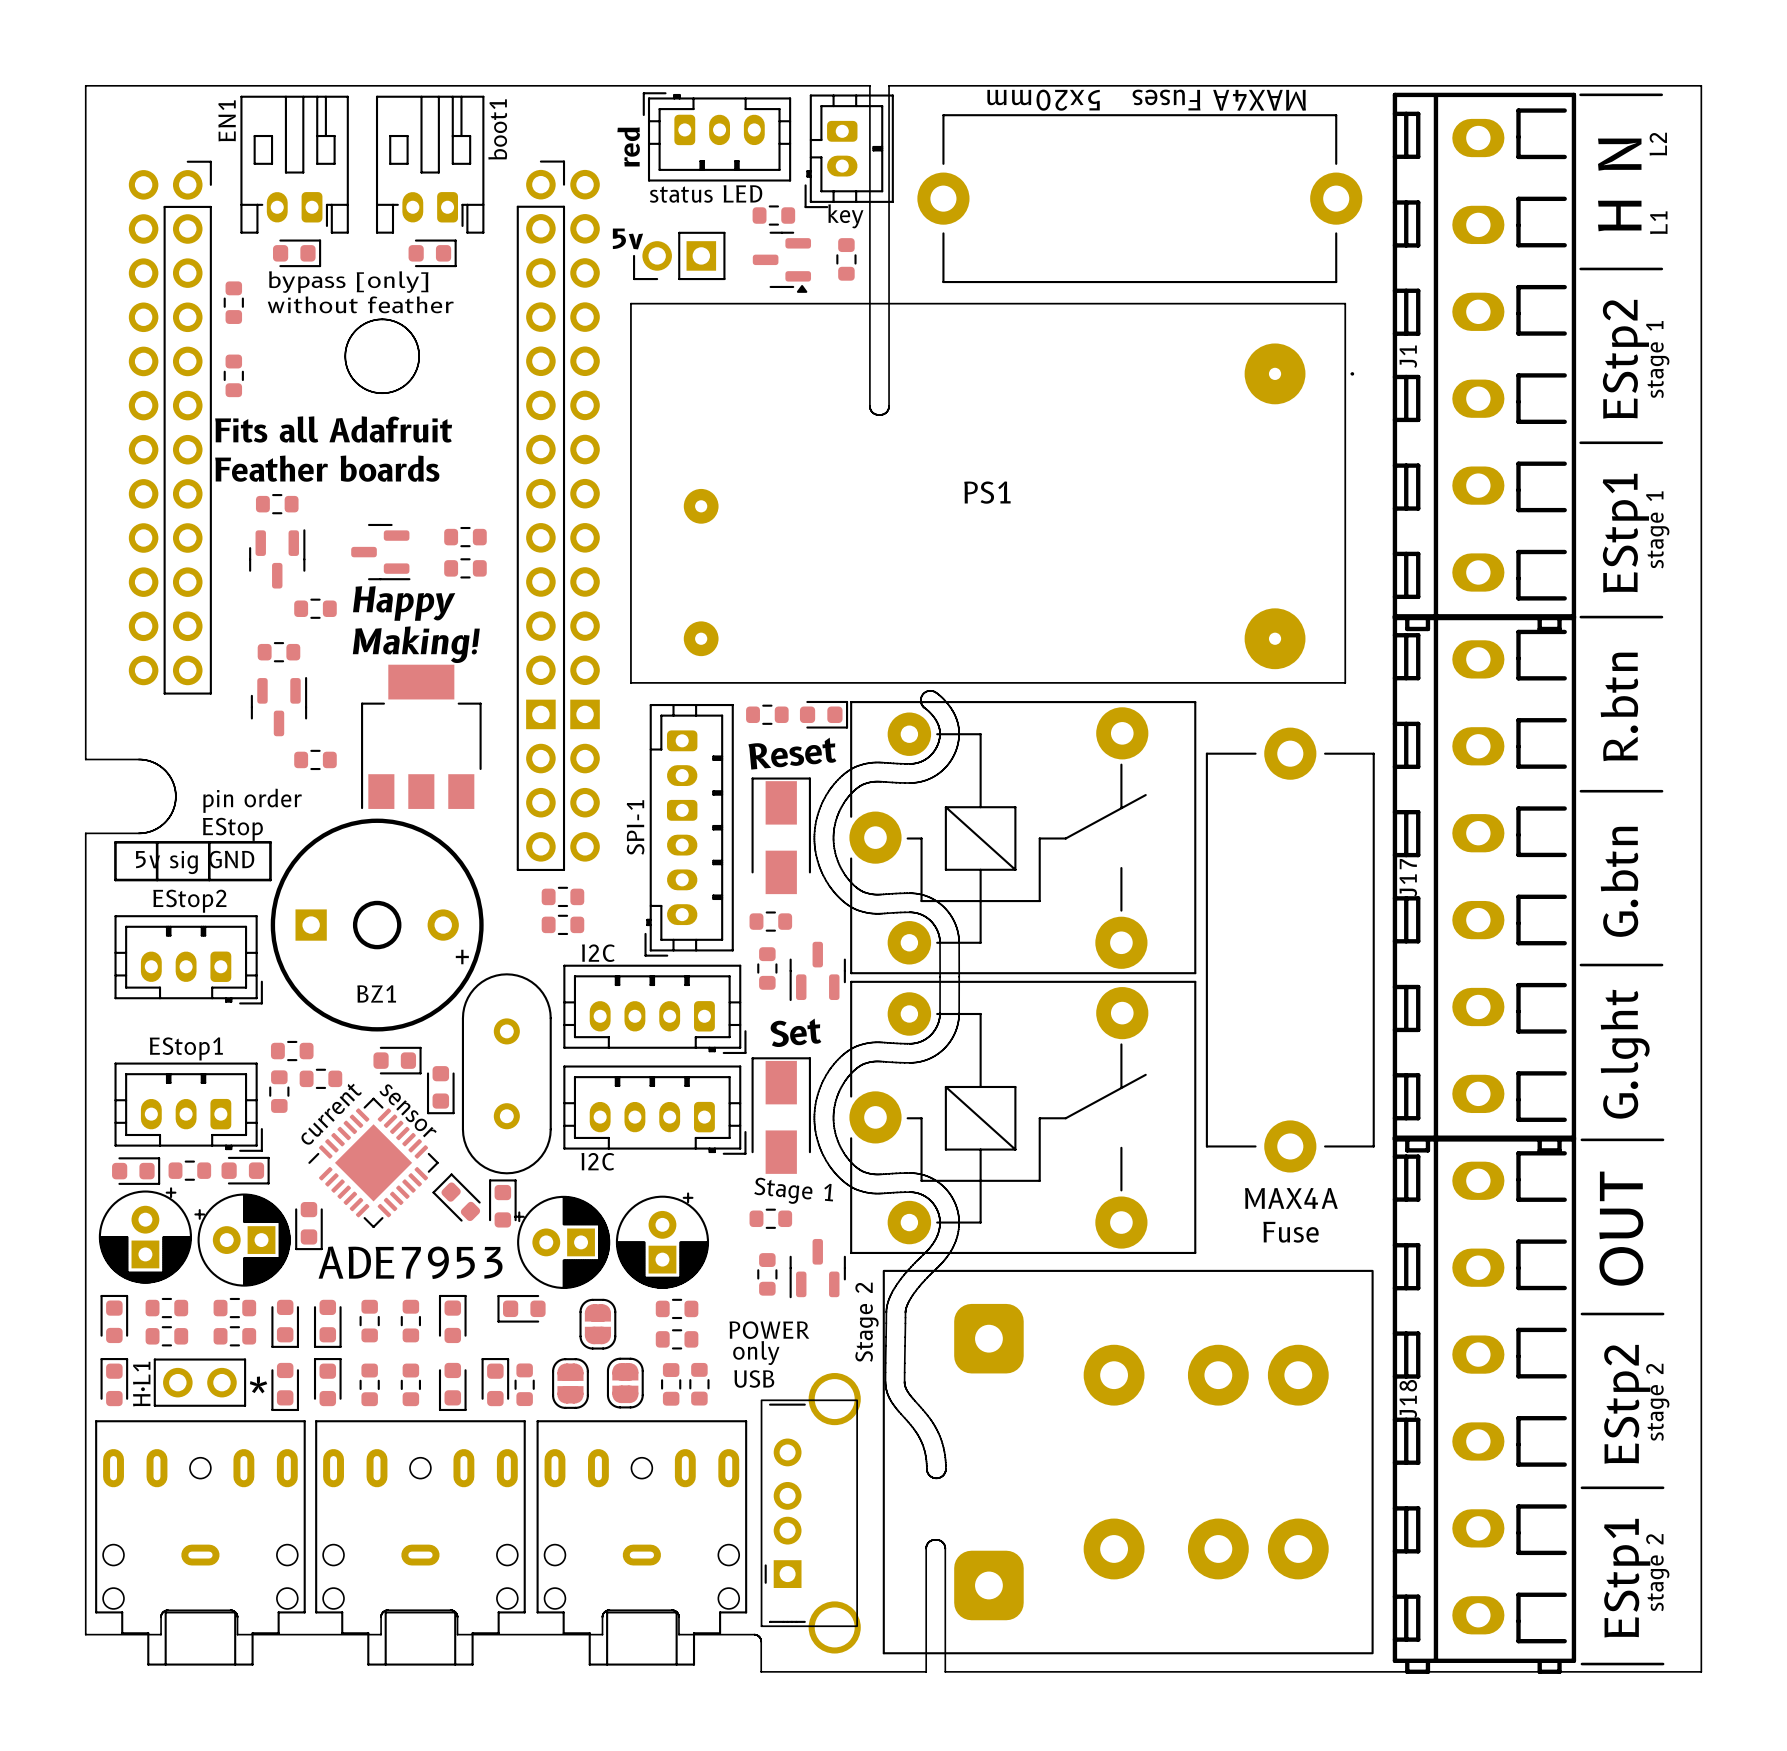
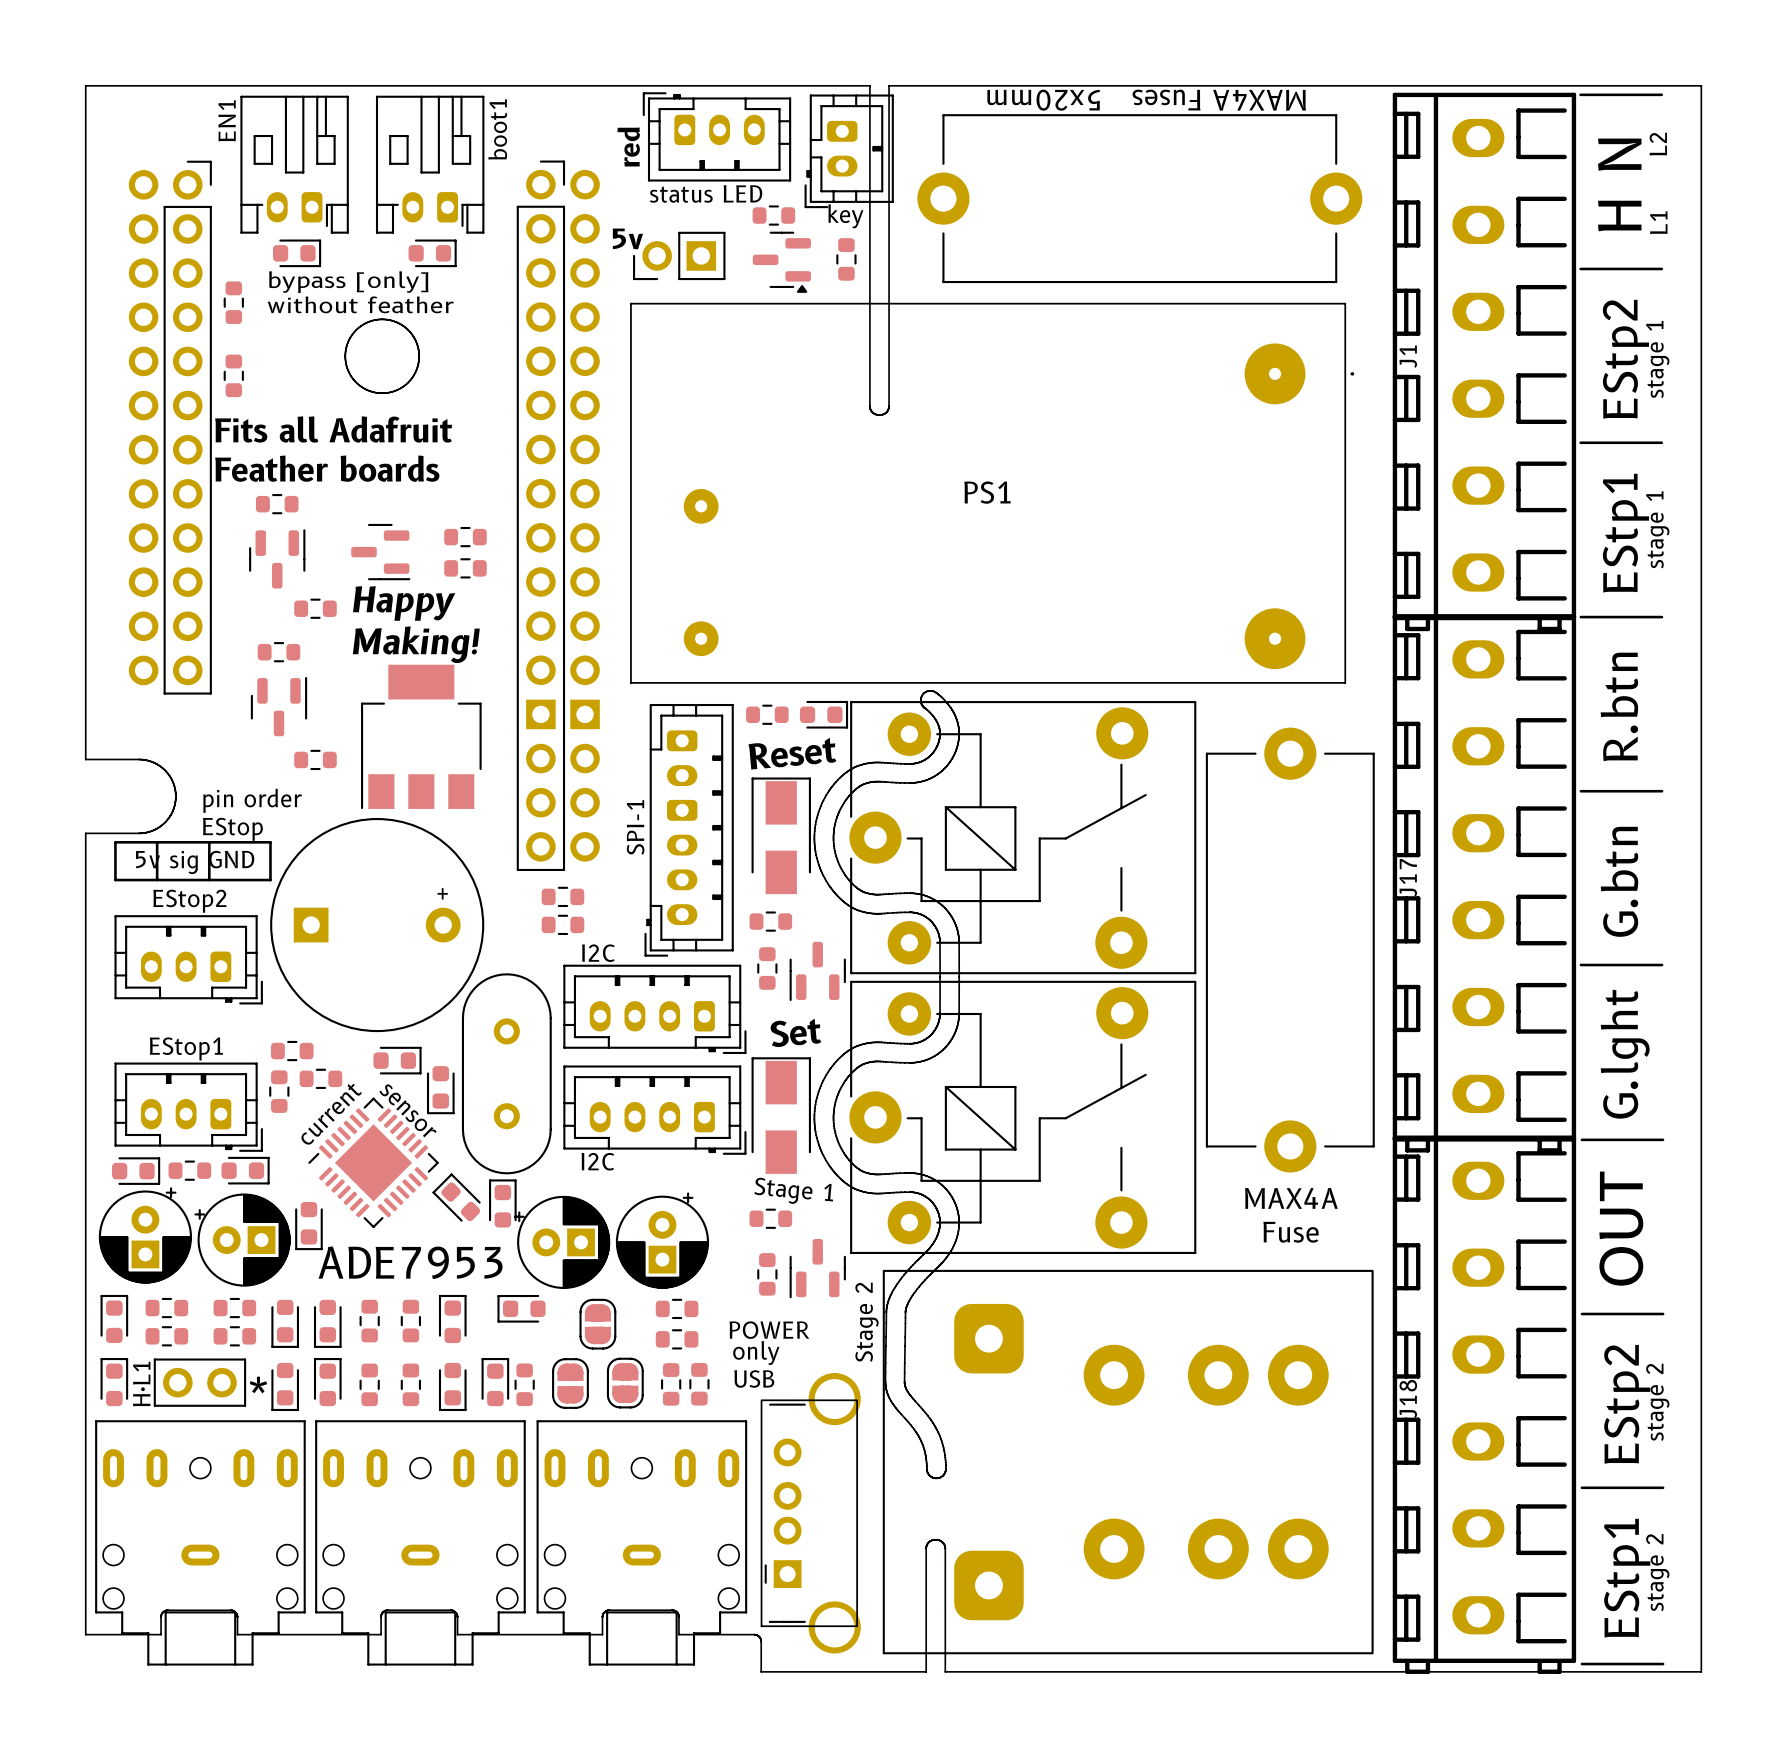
BZ1: (377, 925) -> none
part: none -> (377, 925)

